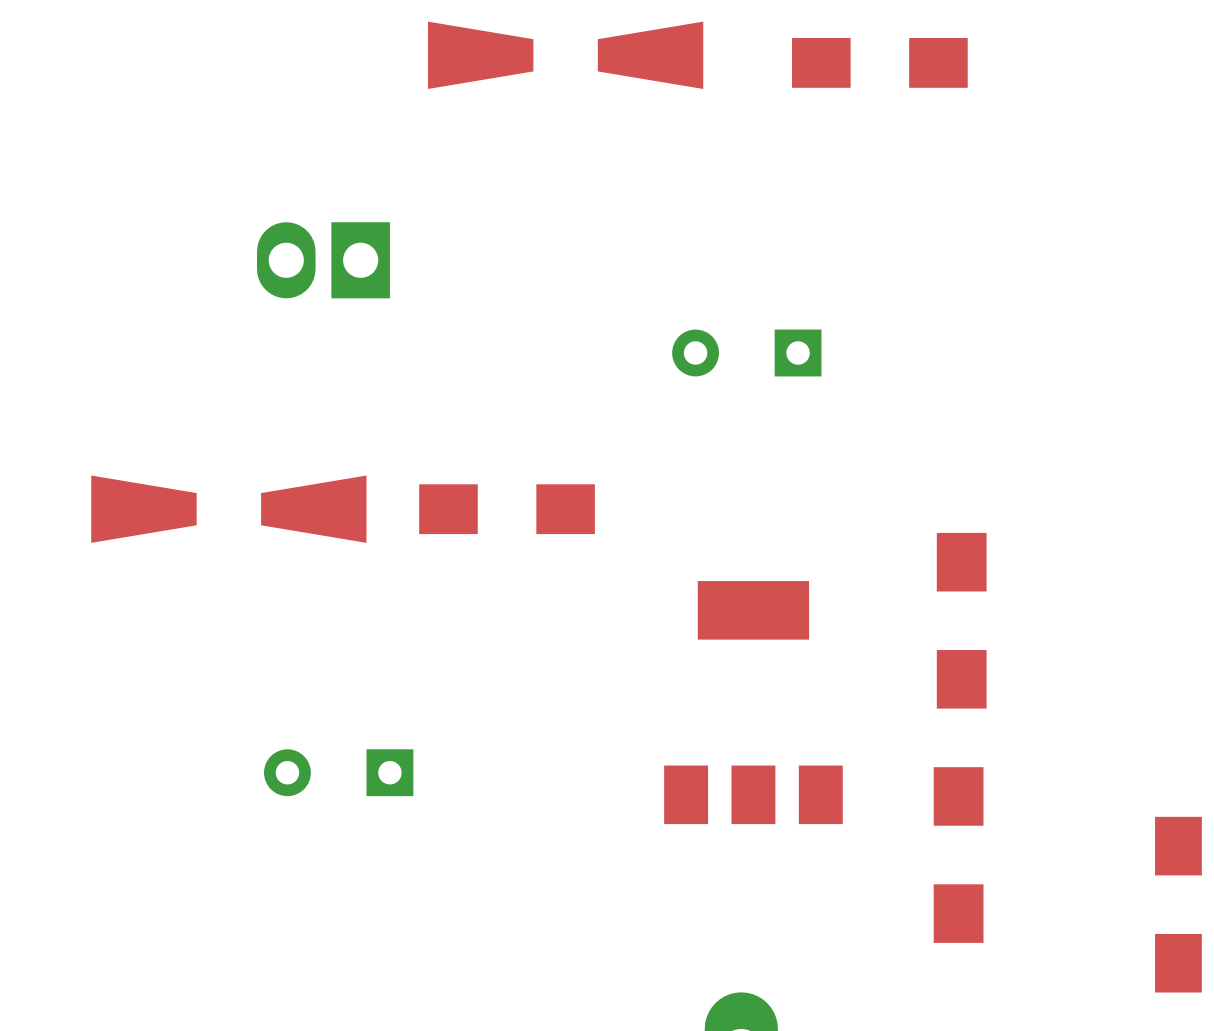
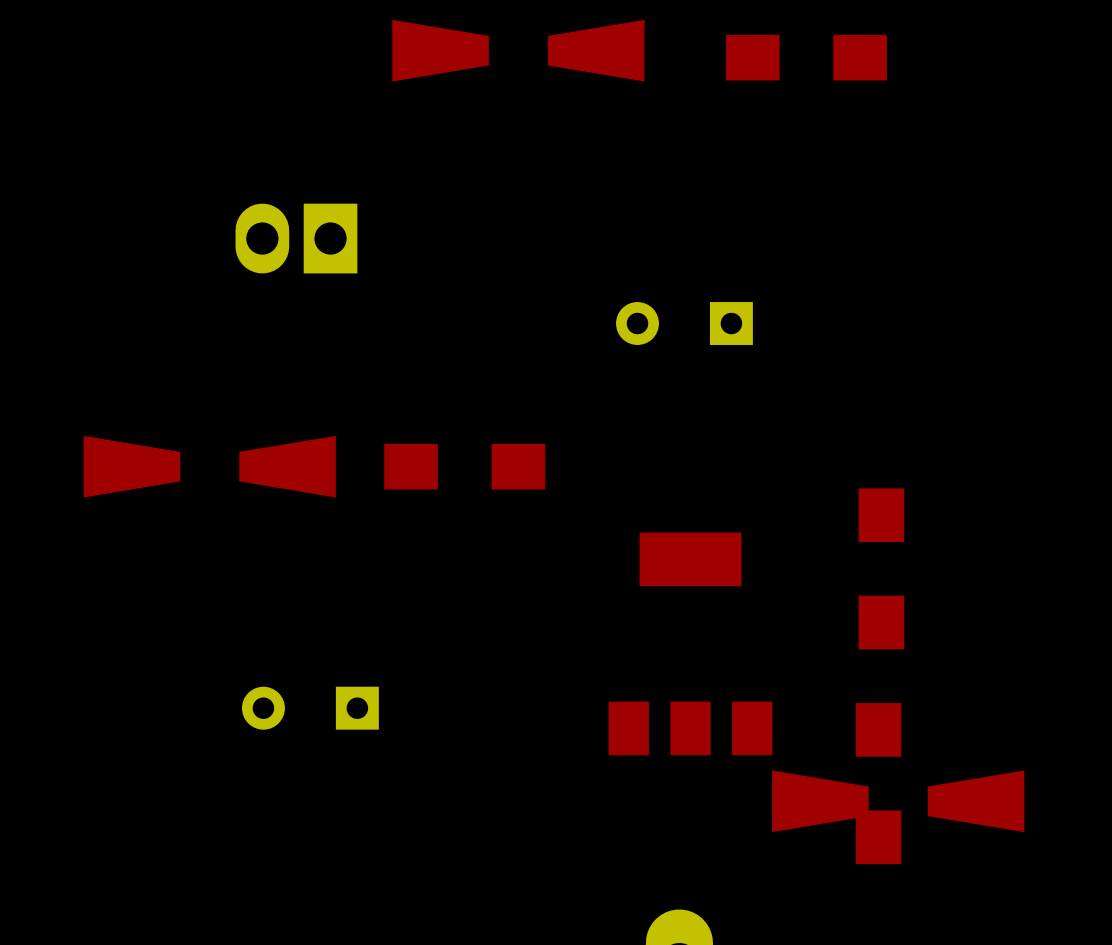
part: none -> (898, 801)
part: (1178, 904) -> none

